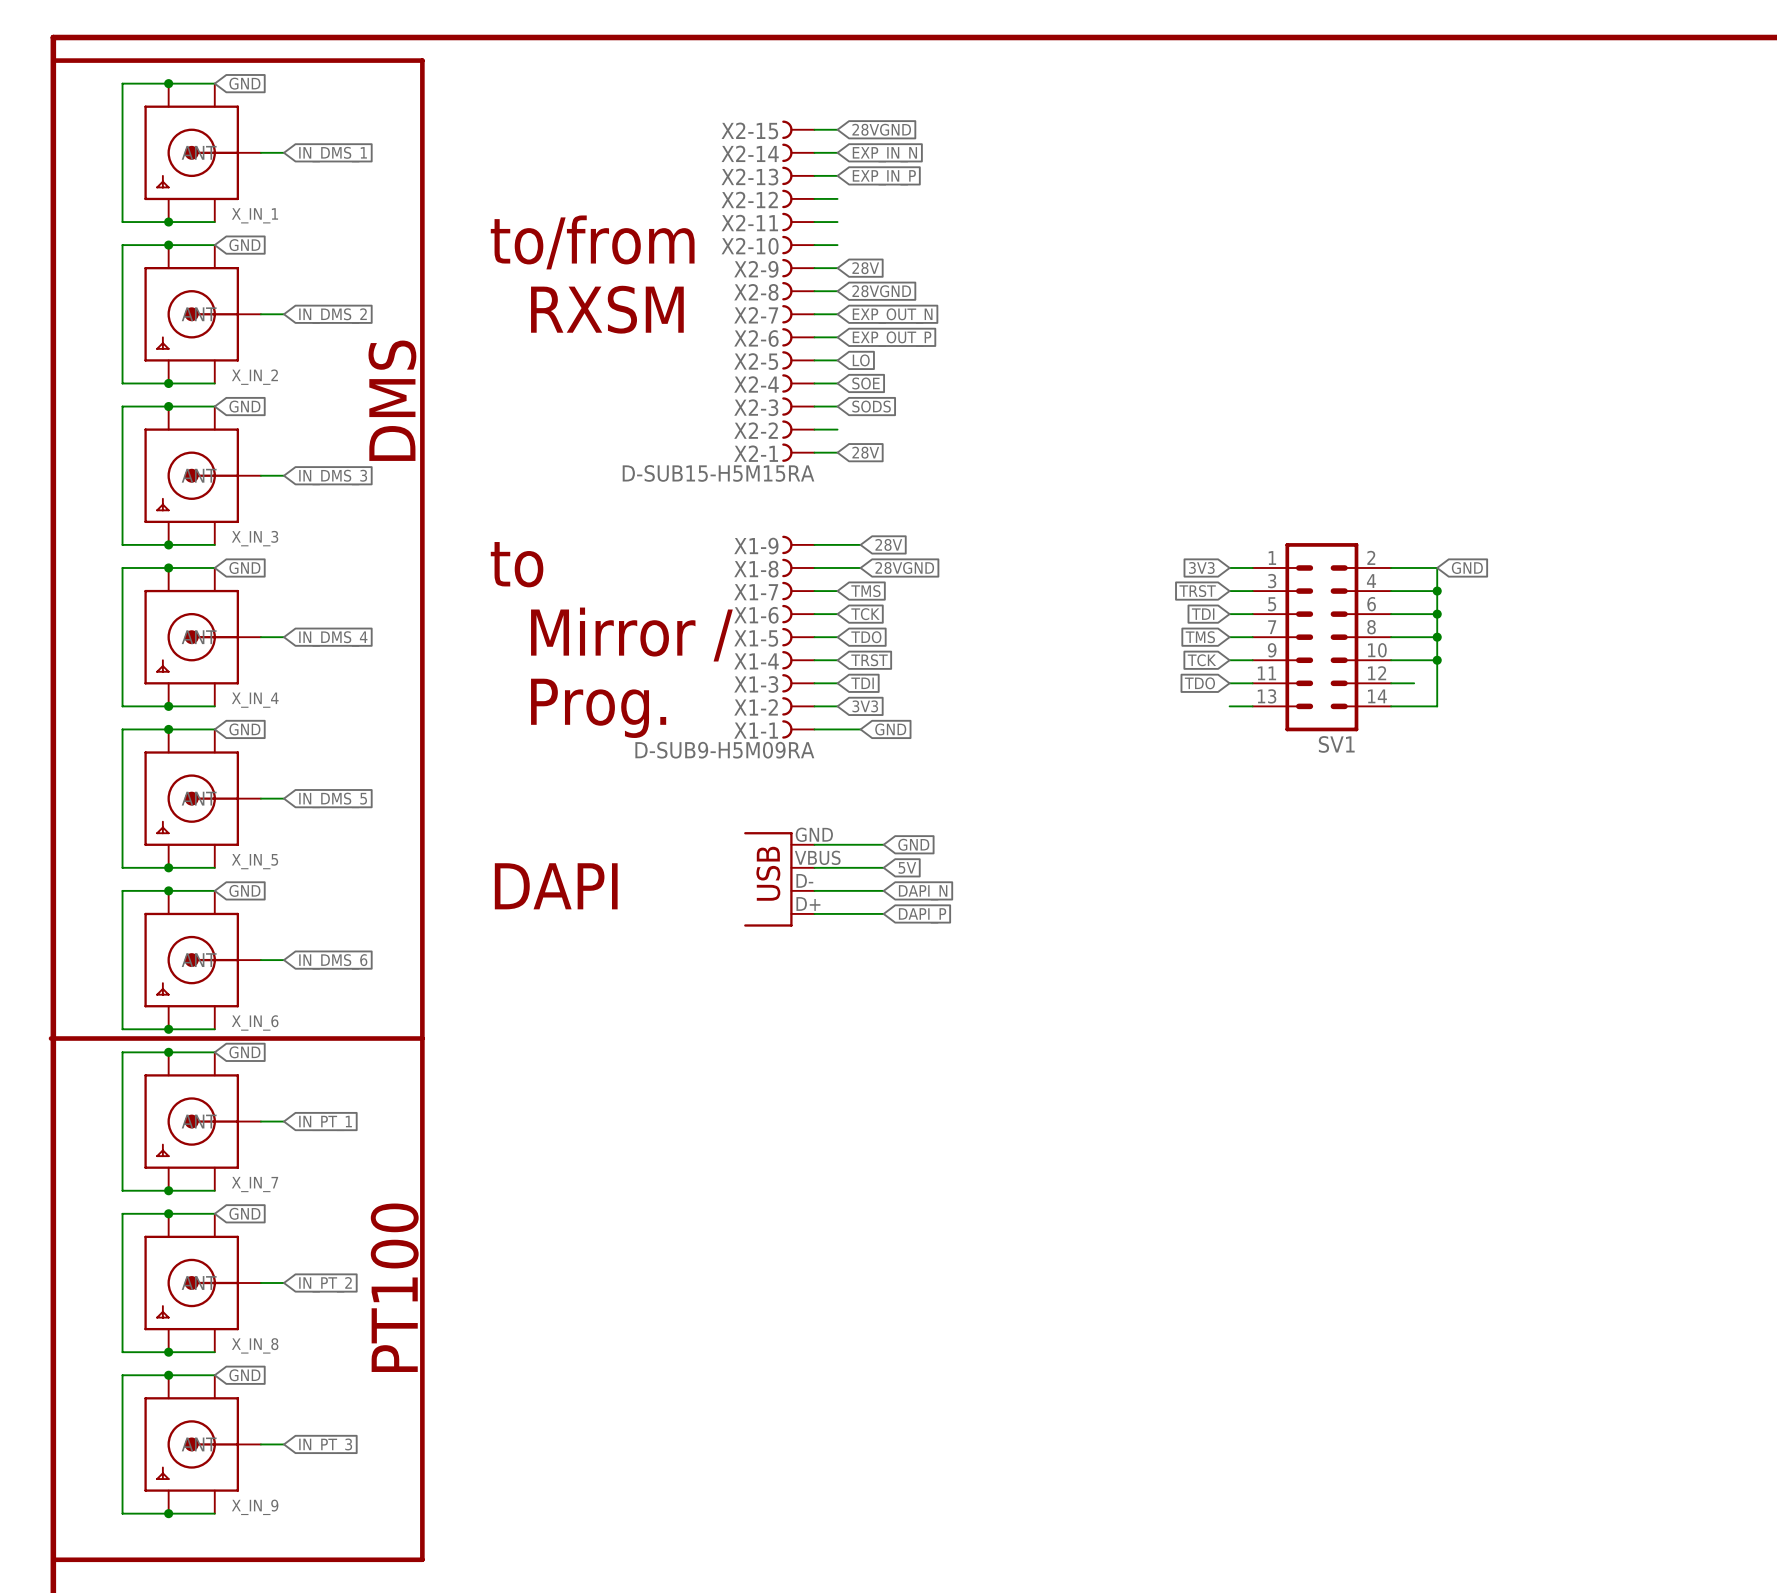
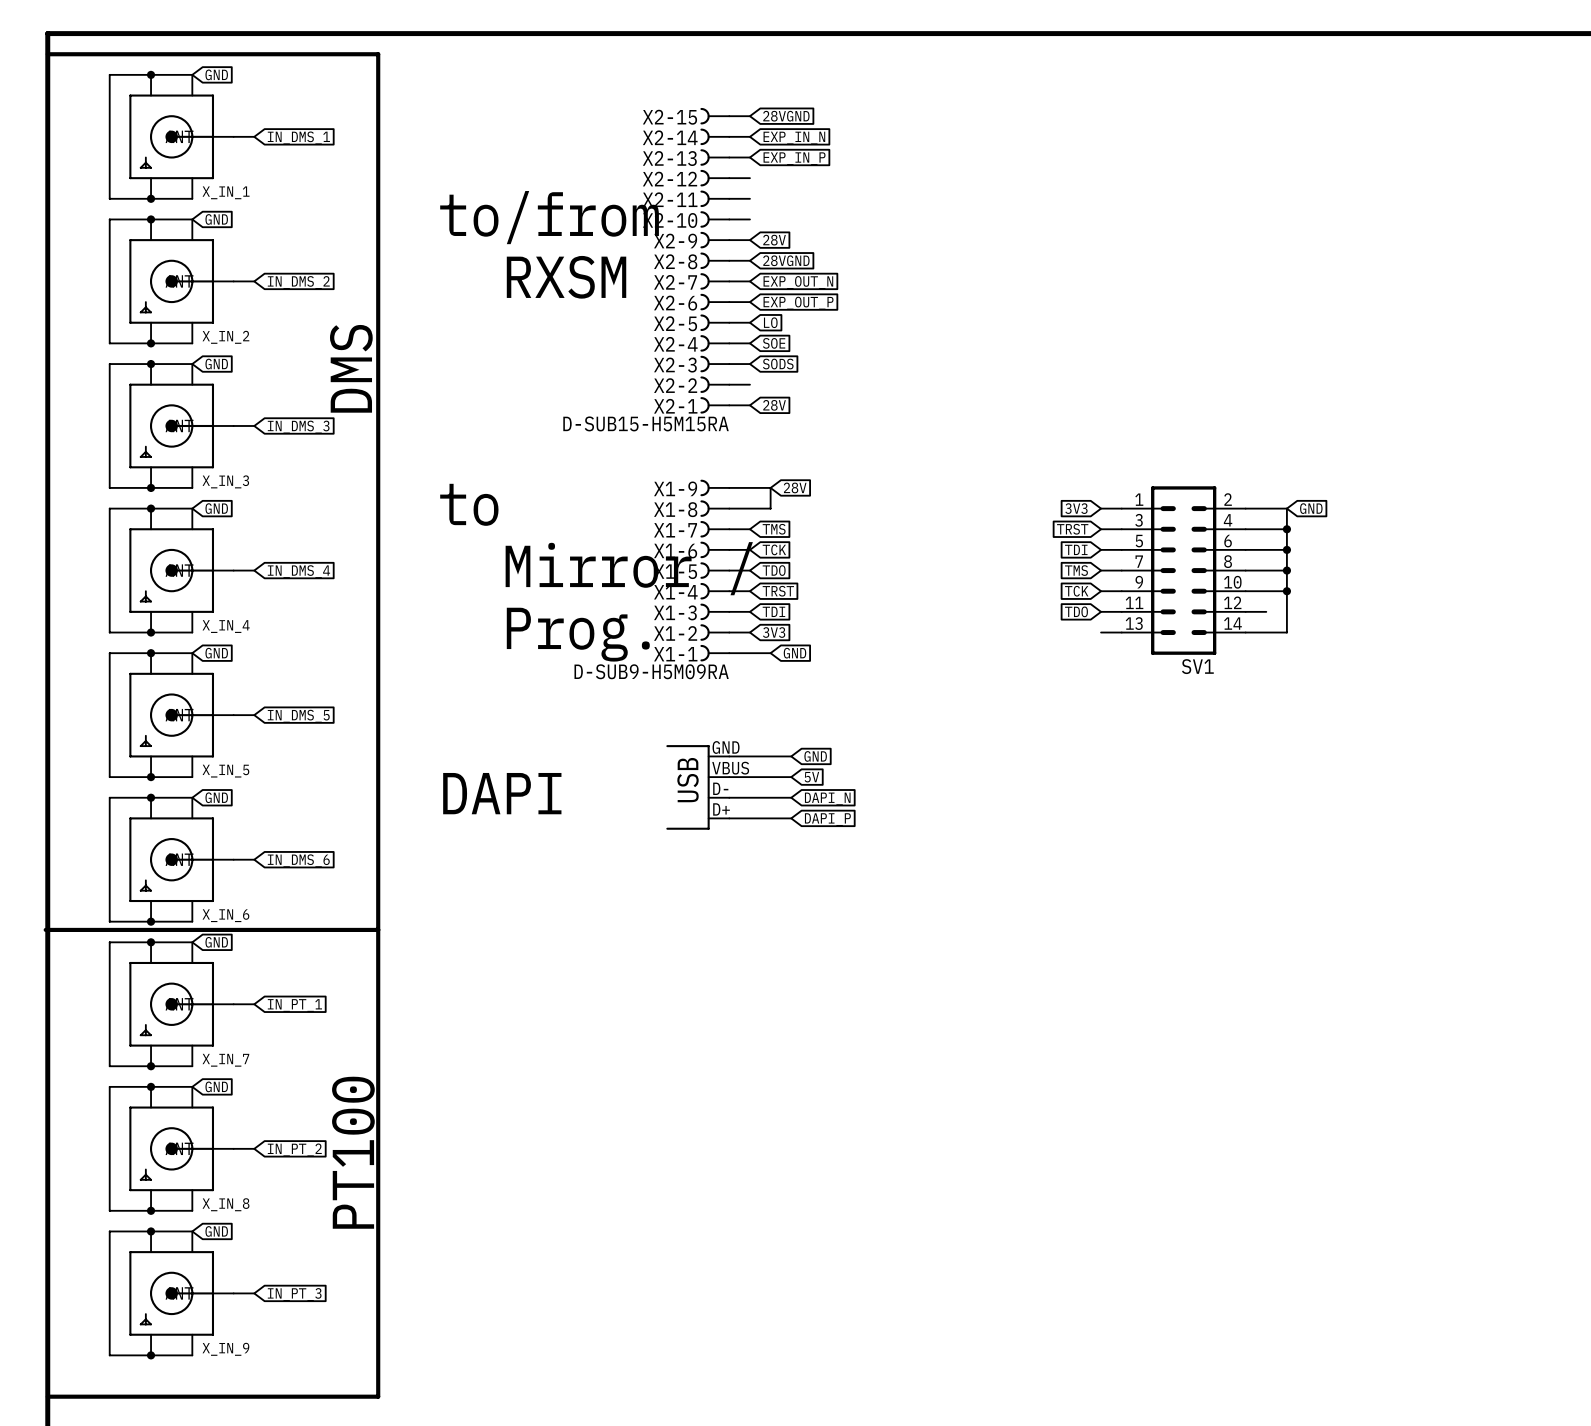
wire: none -> (770, 487) (770, 508)
global label: 28VGND (904, 568) -> none

